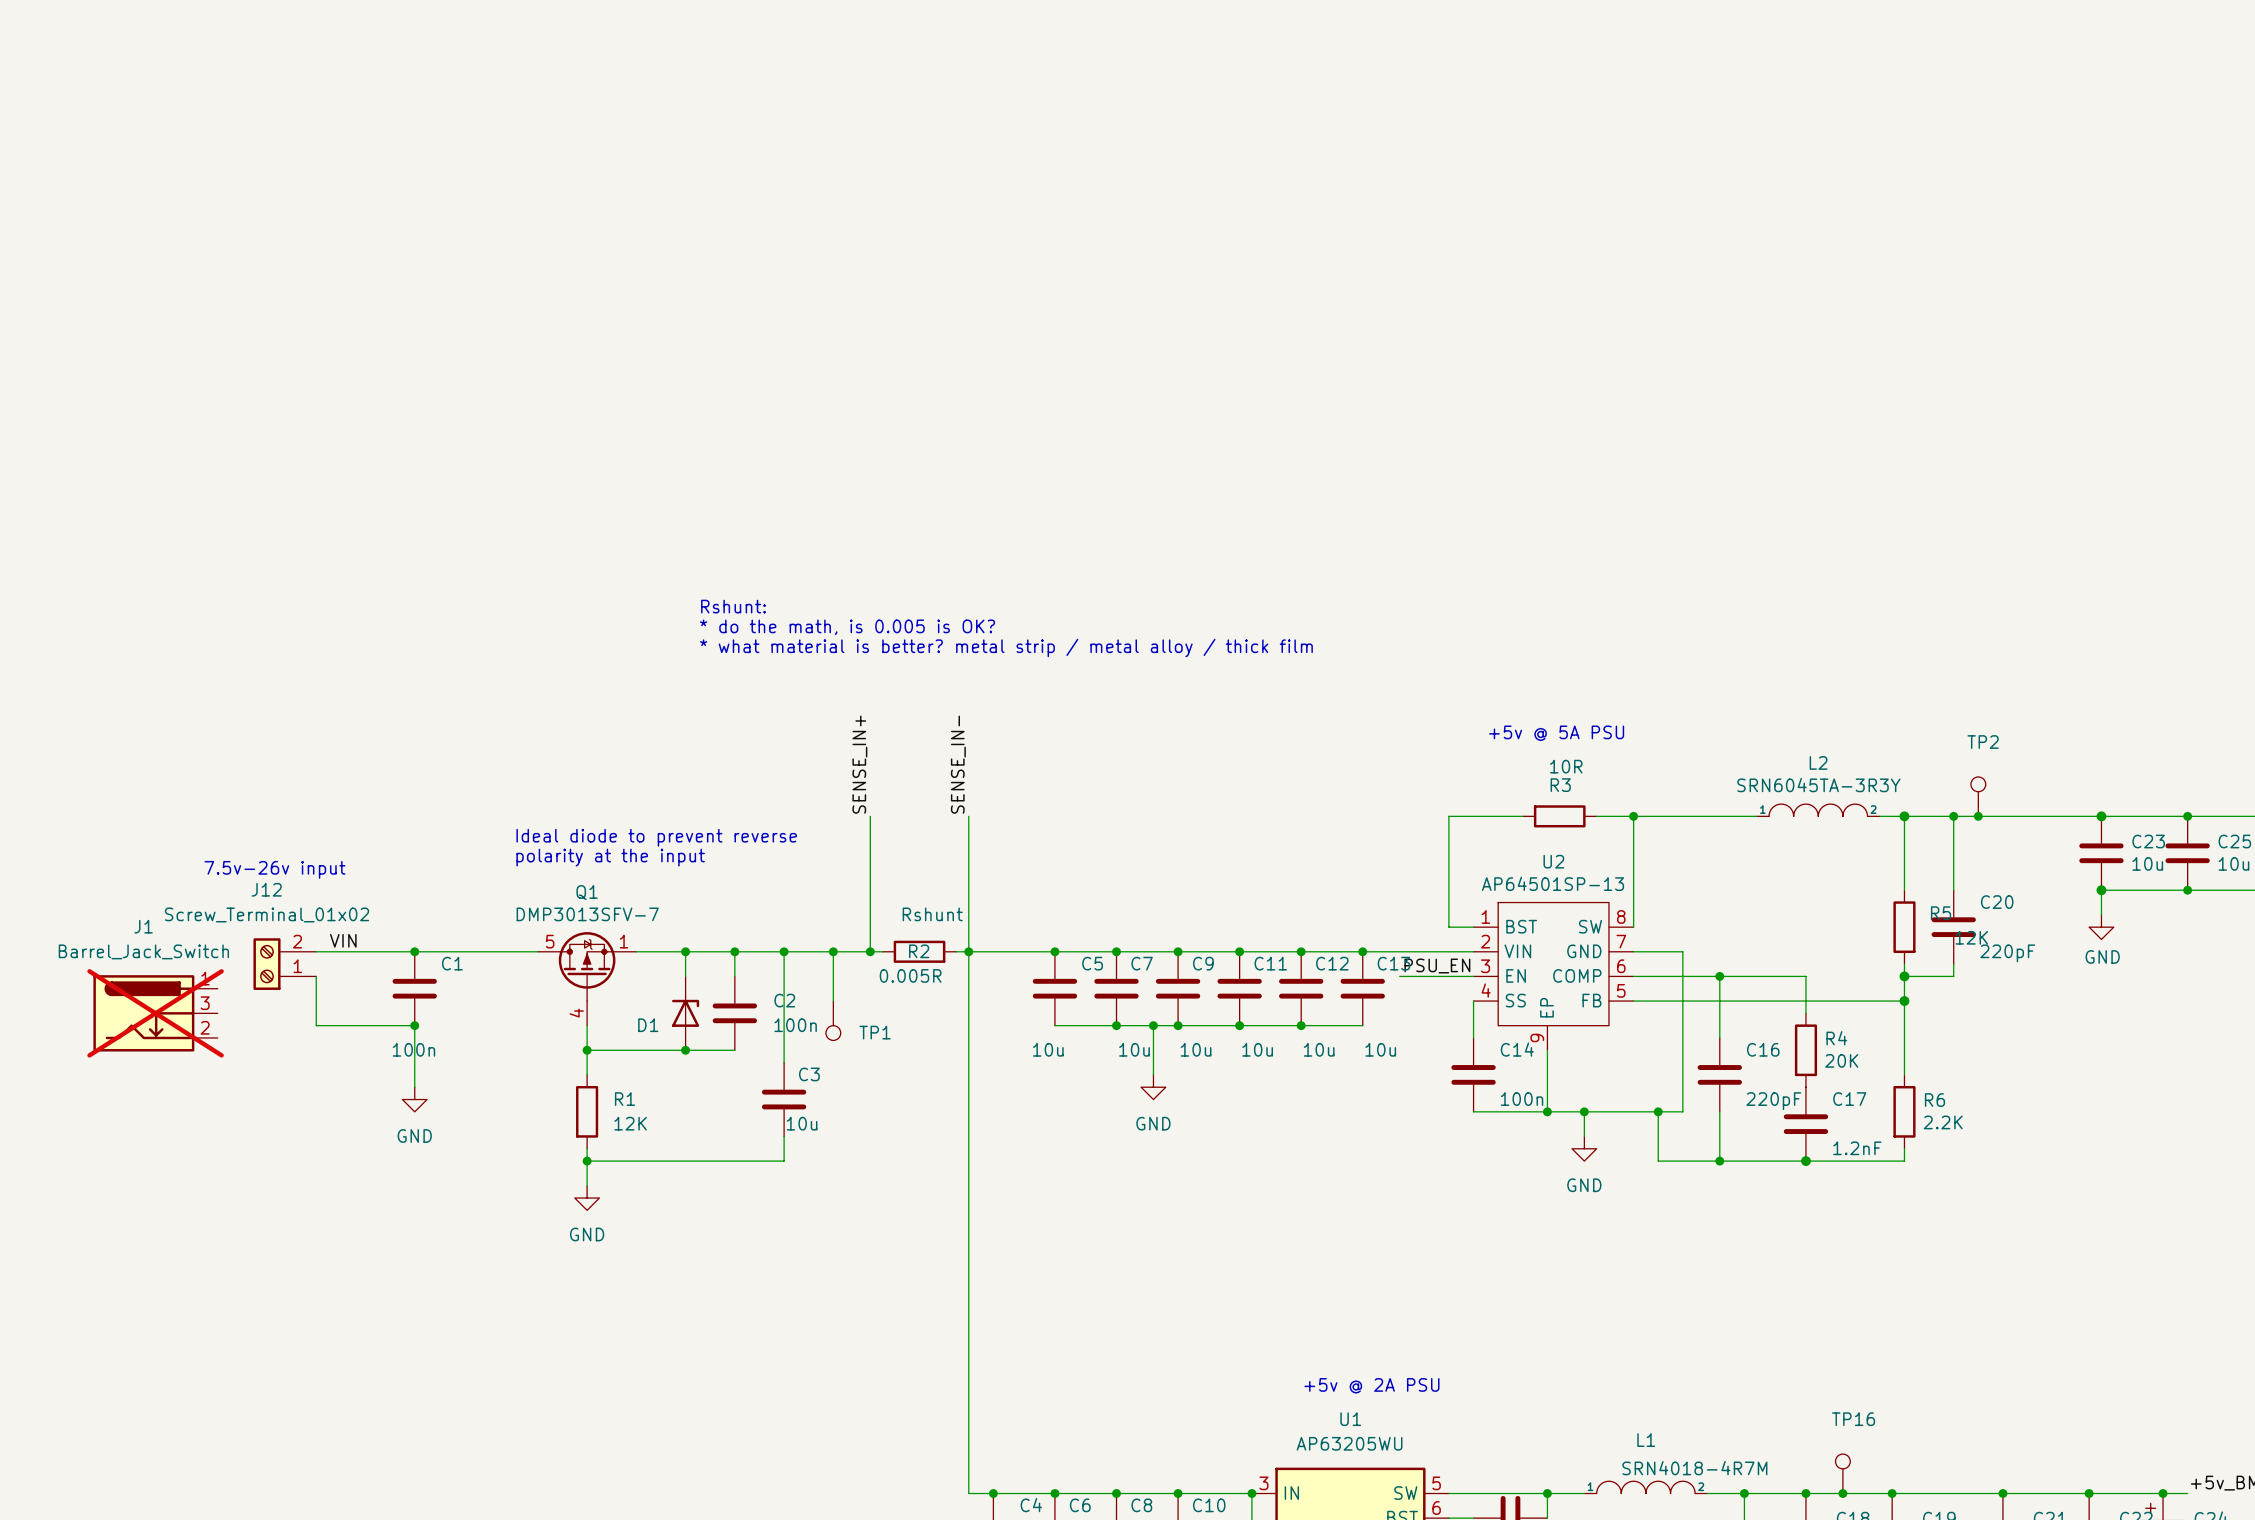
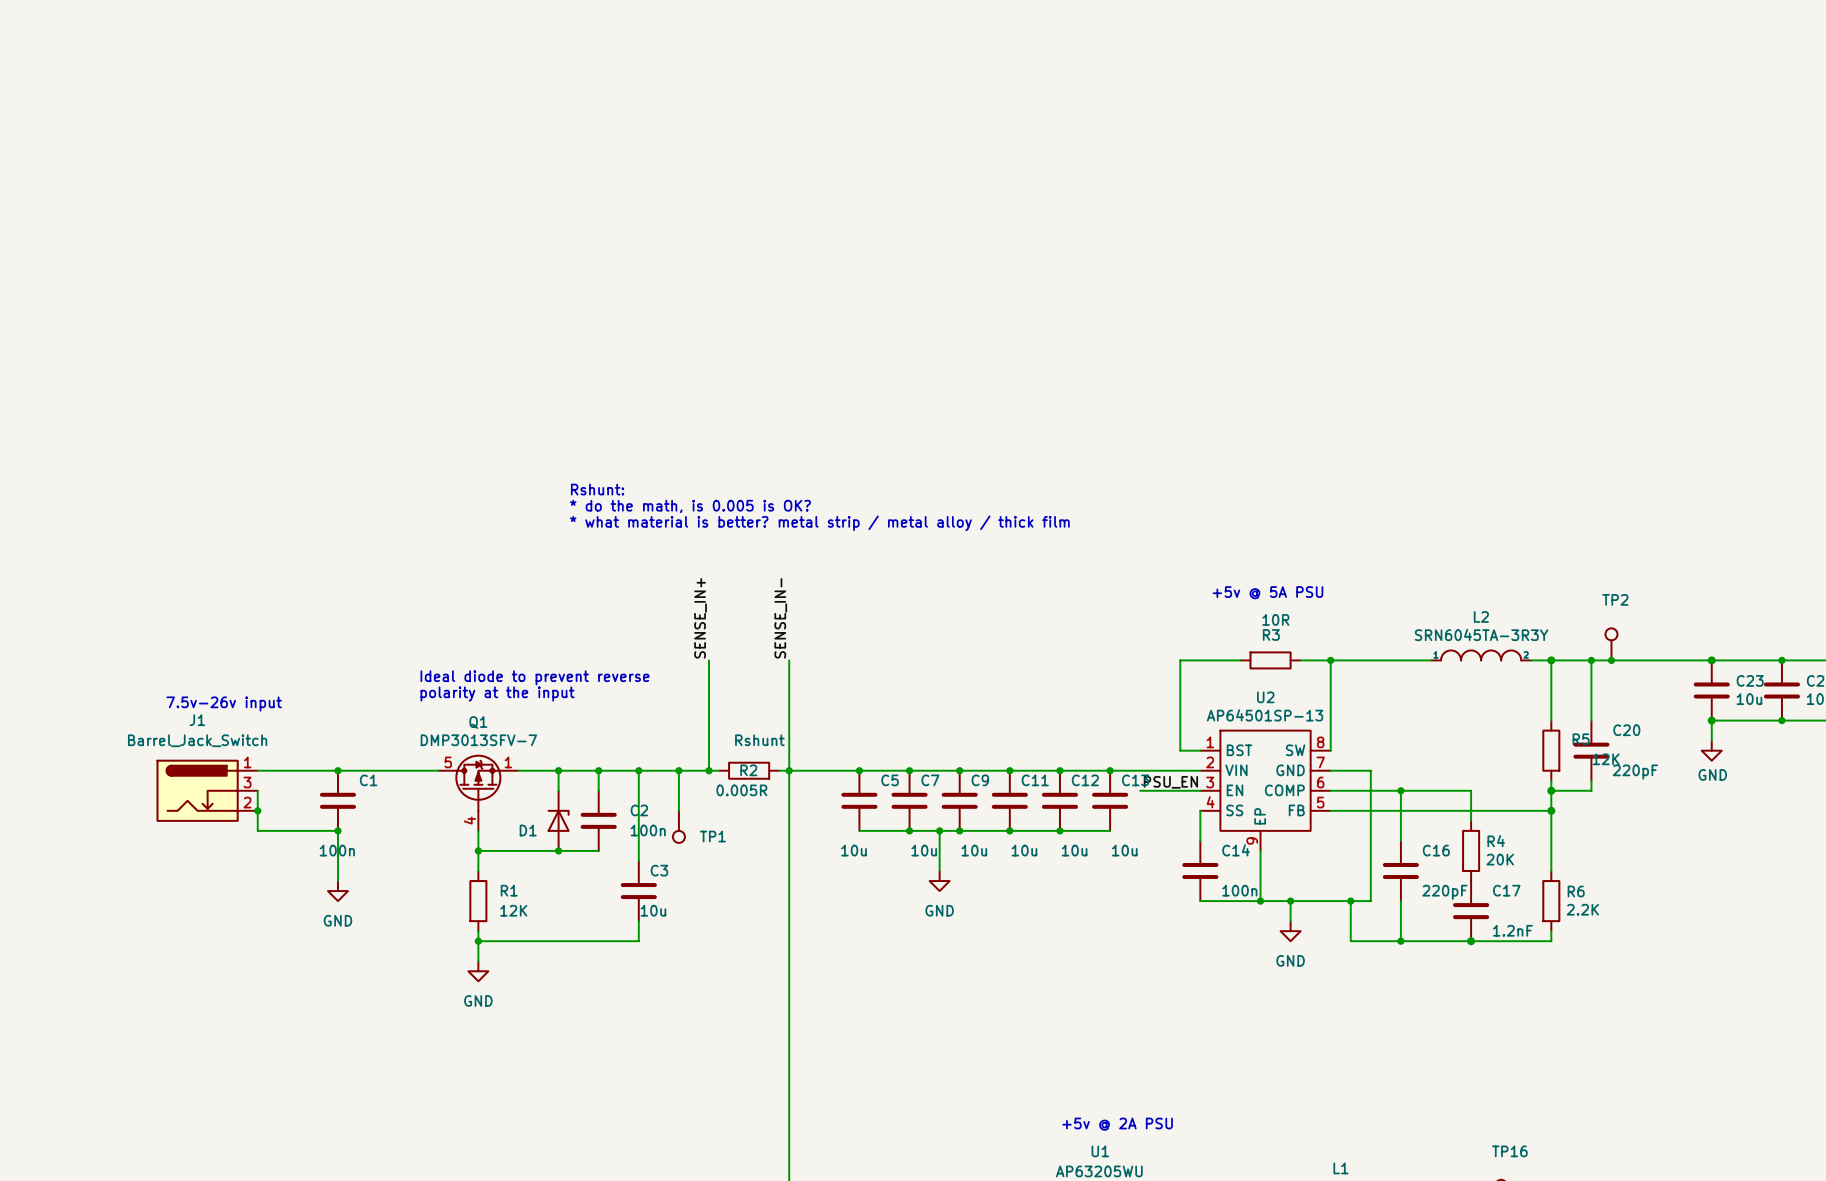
label: VIN (343, 940) -> none
J12: Screw_Terminal_01x02 (284, 964) -> none
junction: none -> (257, 810)
J1 position: (155, 1013) -> (207, 790)
J1 do-not-place cross: (155, 1013) -> none

